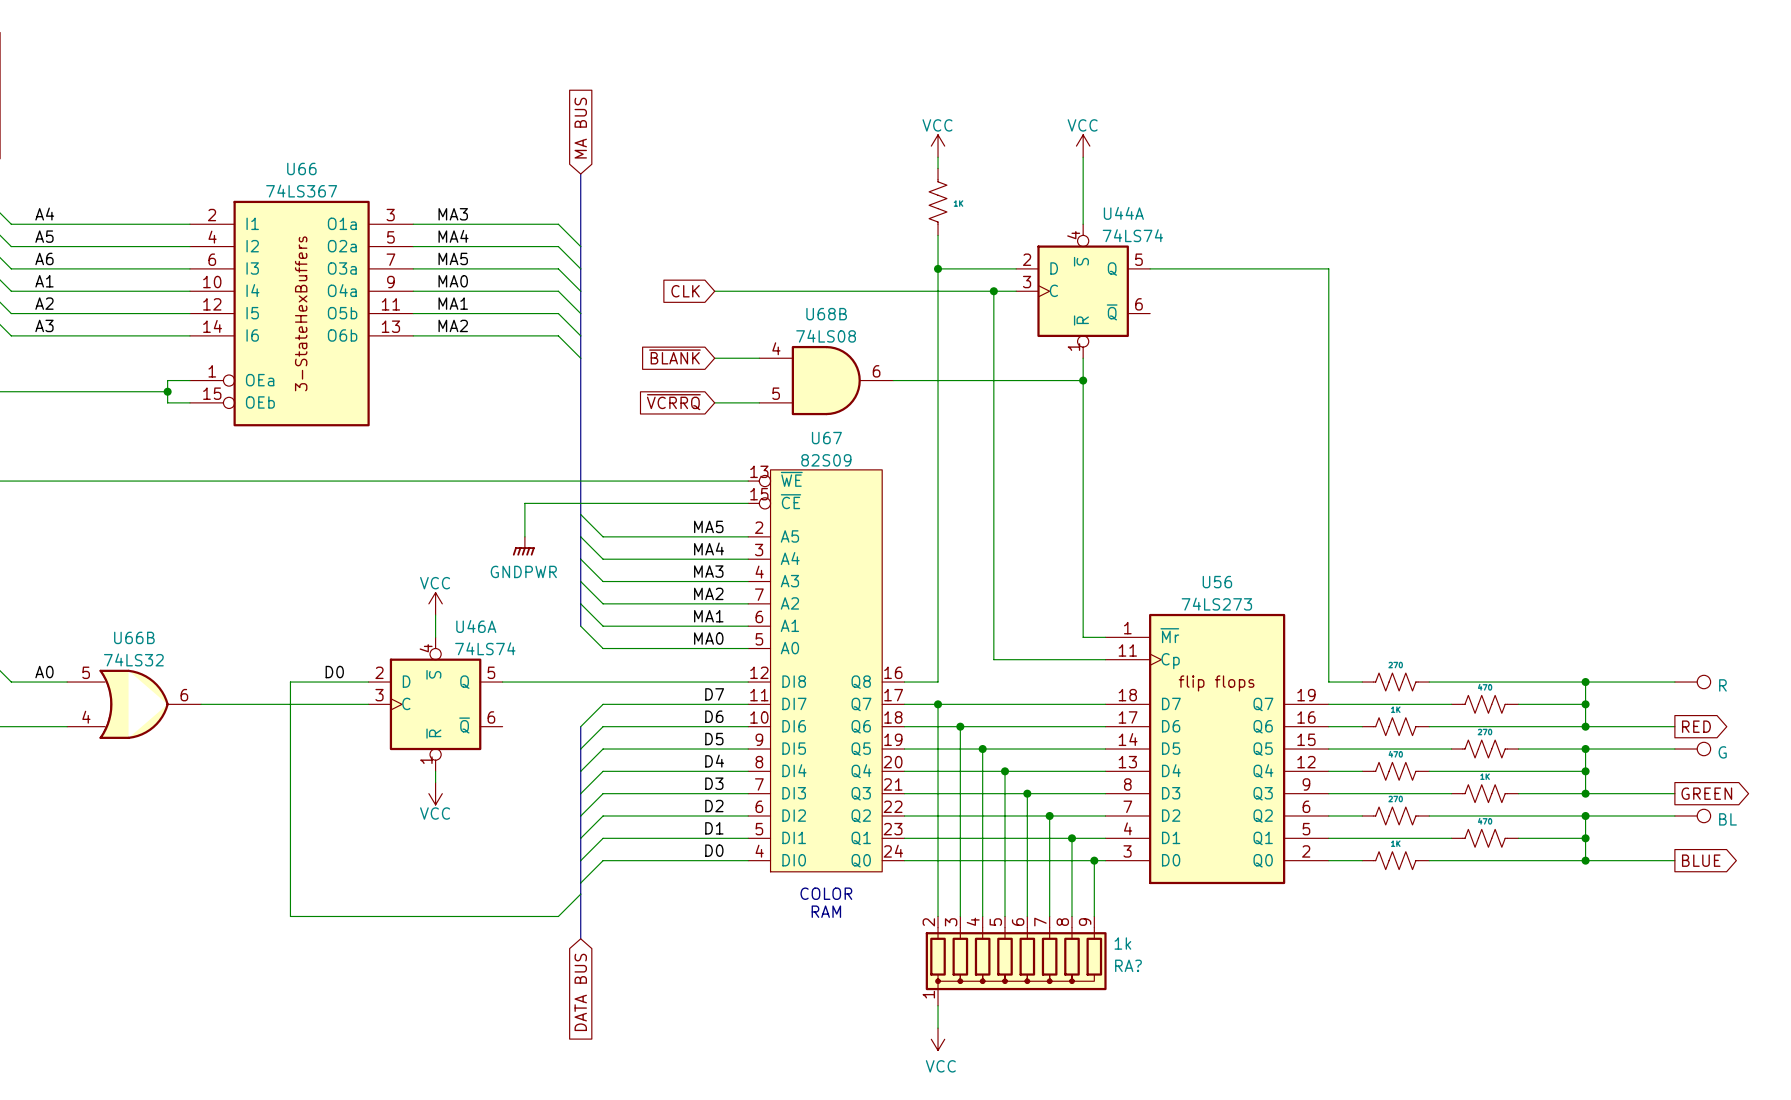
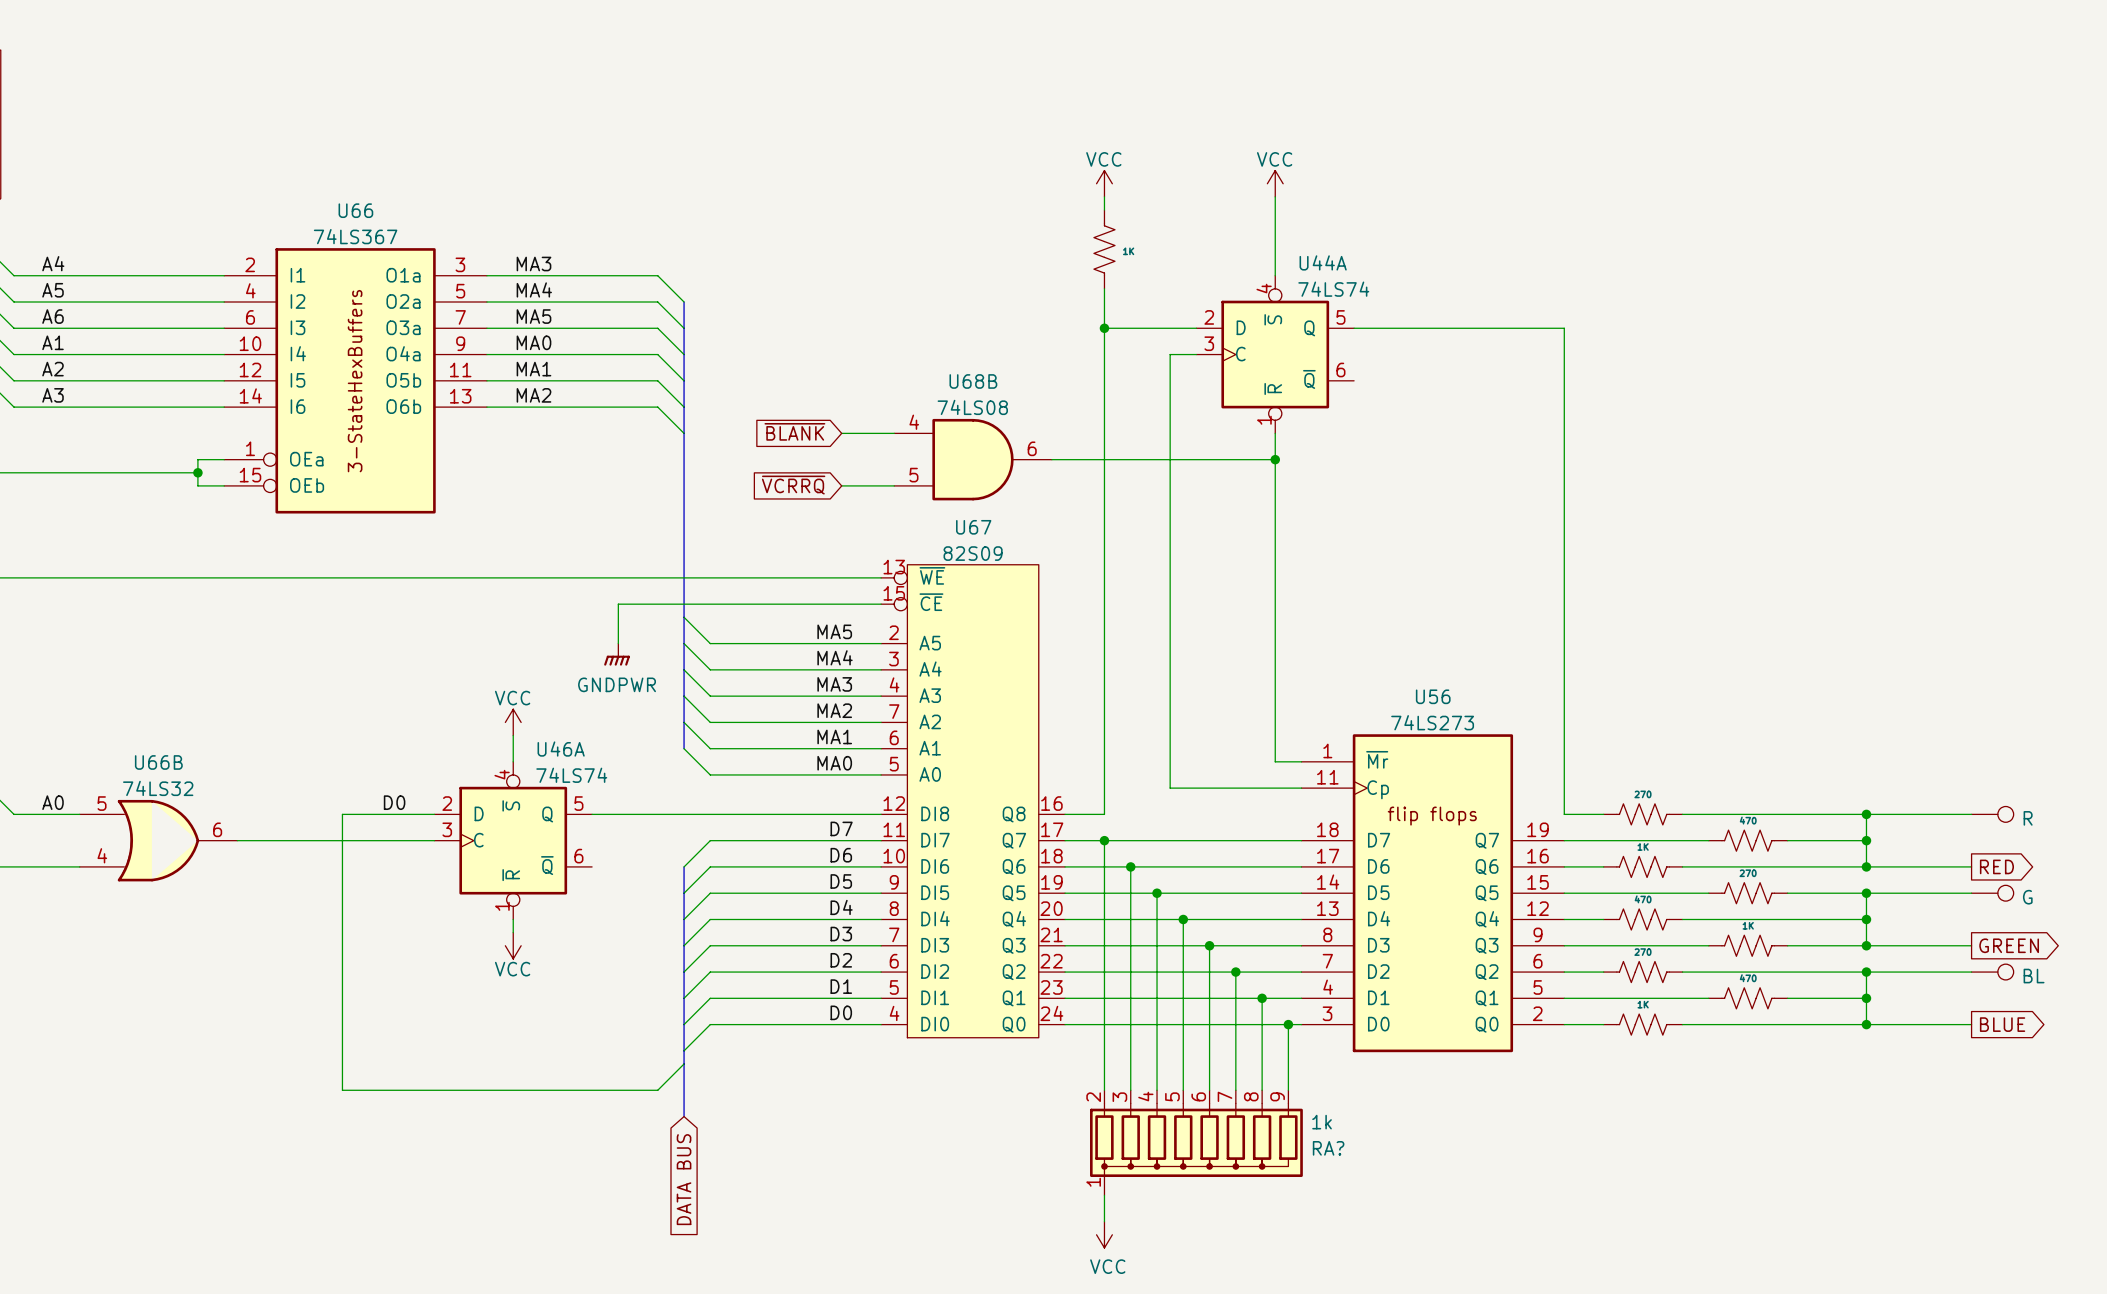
global label: MA BUS (580, 128) -> none
bus: (580, 174) (580, 246) -> none
global label: CLK (685, 291) -> none
wire: (714, 291) (993, 291) -> none
junction: (993, 291) -> none
text: COLOR (826, 893) -> none
text: RAM (826, 911) -> none

